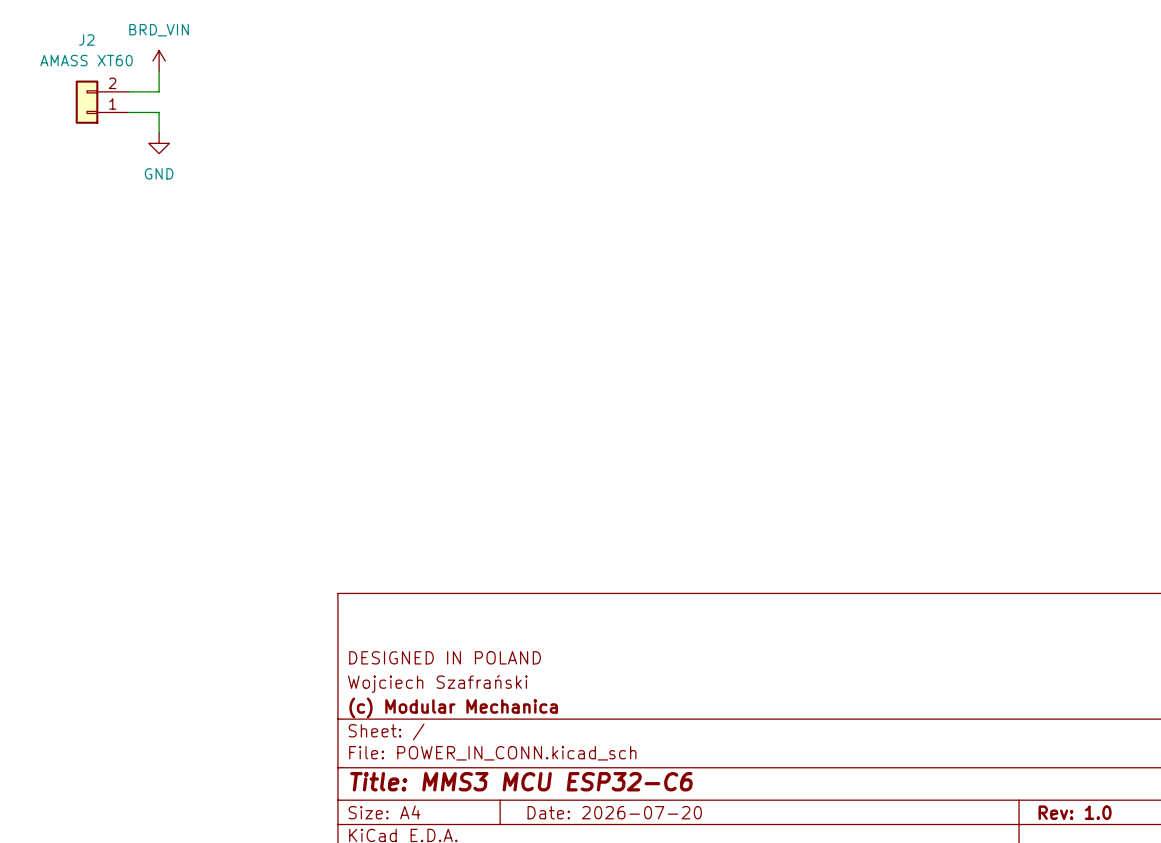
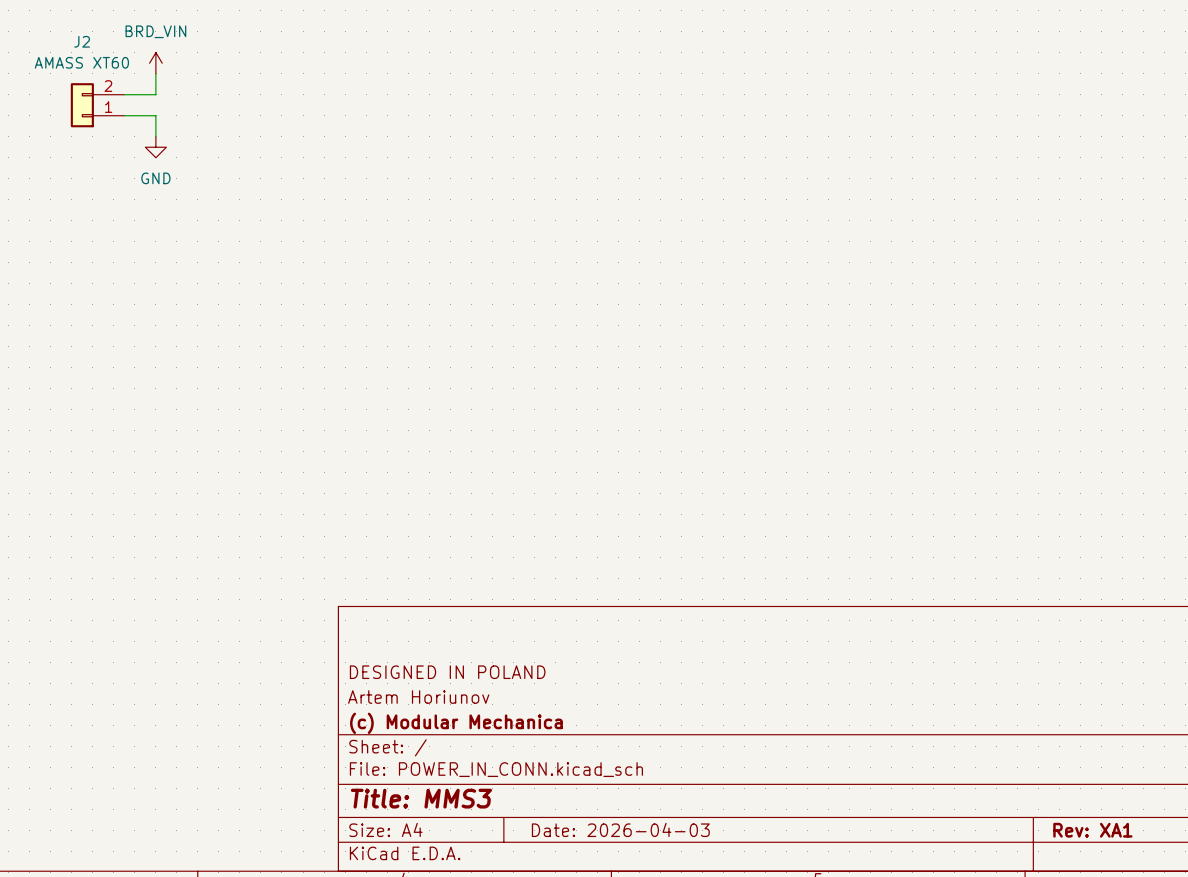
title block: Wojciech Szafrański (437, 683) -> Artem Horiunov (418, 697)
title block: Title: MMS3 MCU ESP32-C6 (521, 781) -> Title: MMS3 (421, 798)
title block: Date: 2026-07-20 (614, 812) -> Date: 2026-04-03 (620, 829)
title block: Rev: 1.0 (1075, 812) -> Rev: XA1 (1092, 830)

